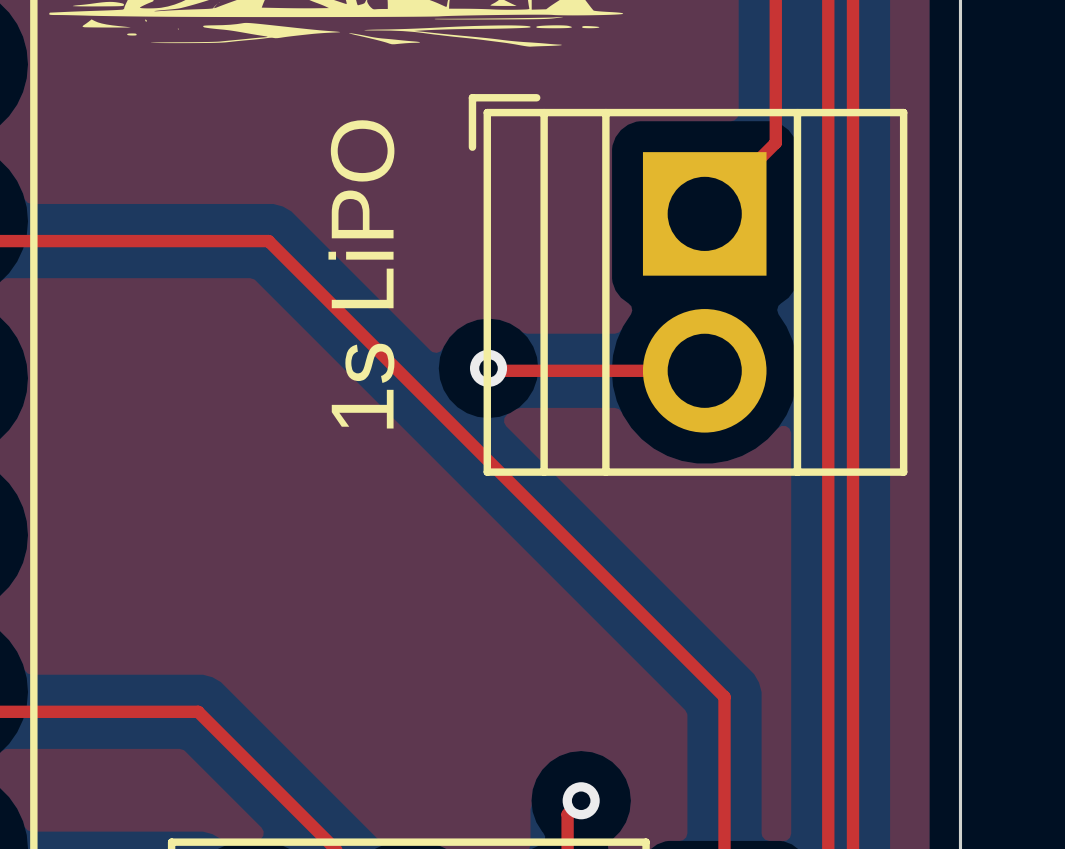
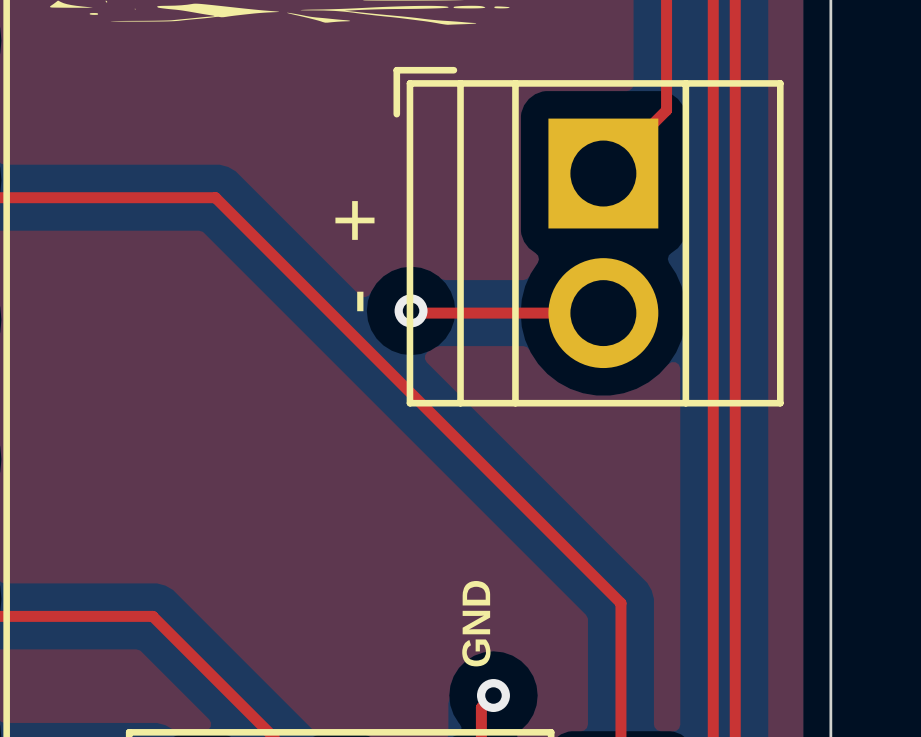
1s LiPO name: 1s LiPO (361, 274) -> - + (354, 256)
text: none -> GND (476, 623)

